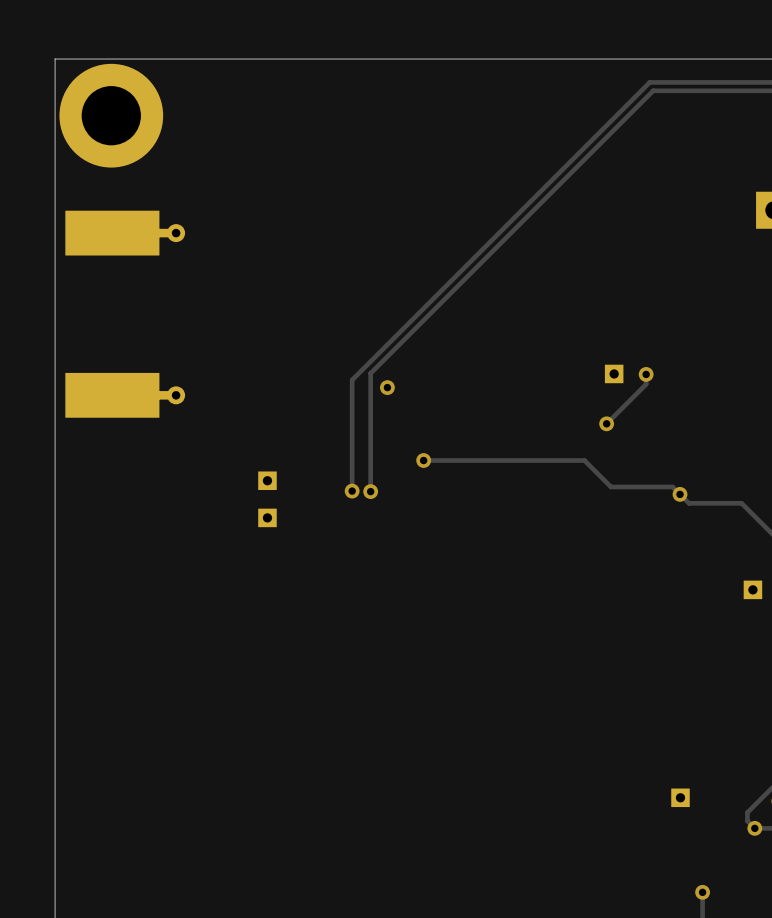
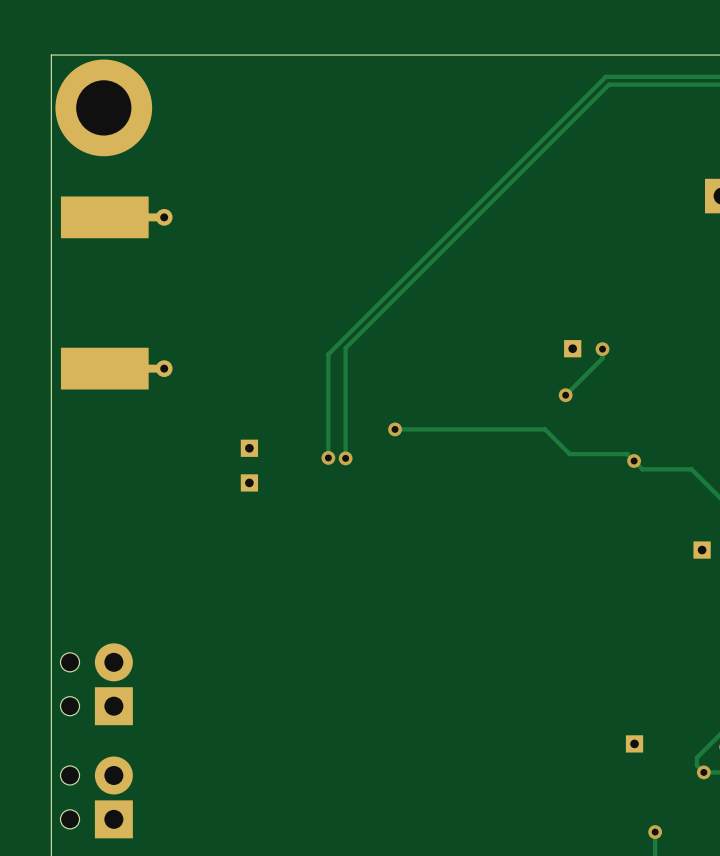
via: (387, 387) -> none
part: none -> (96, 684)
part: none -> (96, 797)

